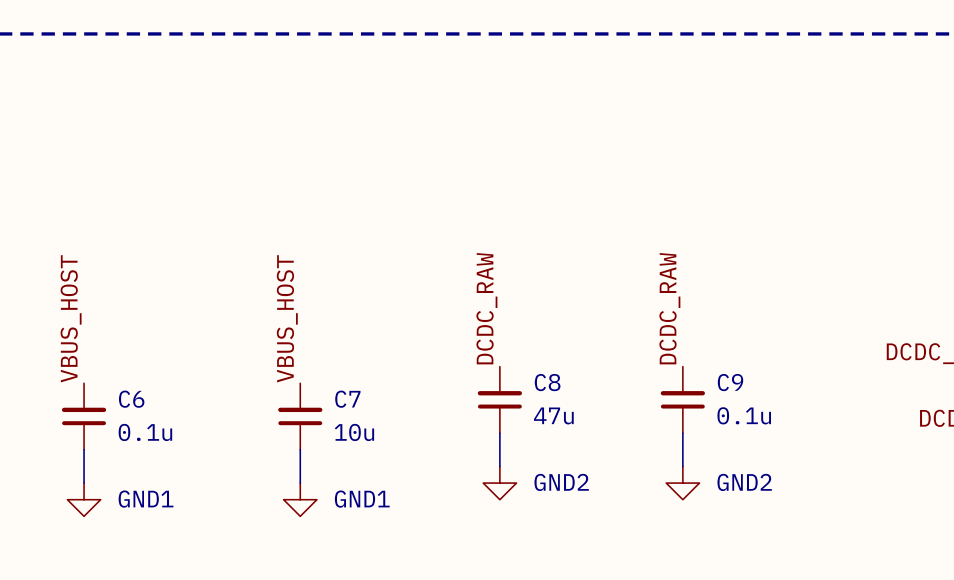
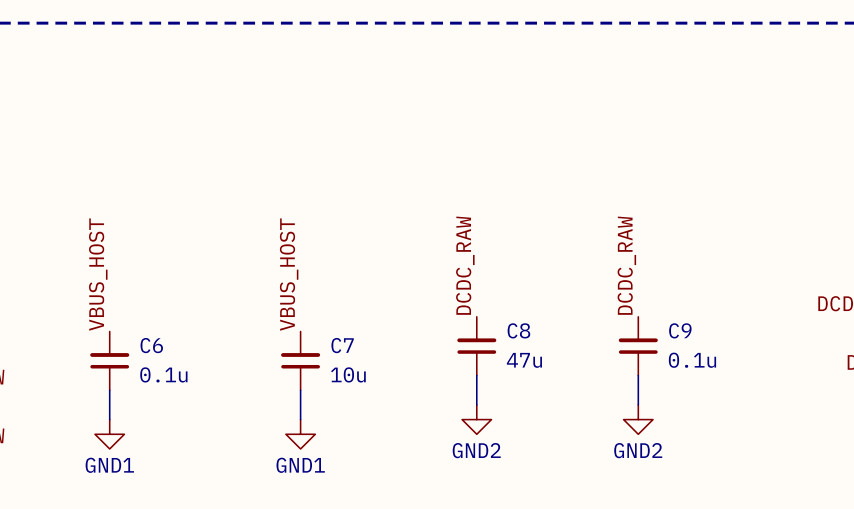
power symbol text position: GND2 (561, 482) -> GND2 (476, 450)
power symbol text position: GND2 (744, 482) -> GND2 (638, 450)
power symbol text position: GND1 (146, 499) -> GND1 (109, 465)
power symbol text position: GND1 (362, 499) -> GND1 (300, 465)

